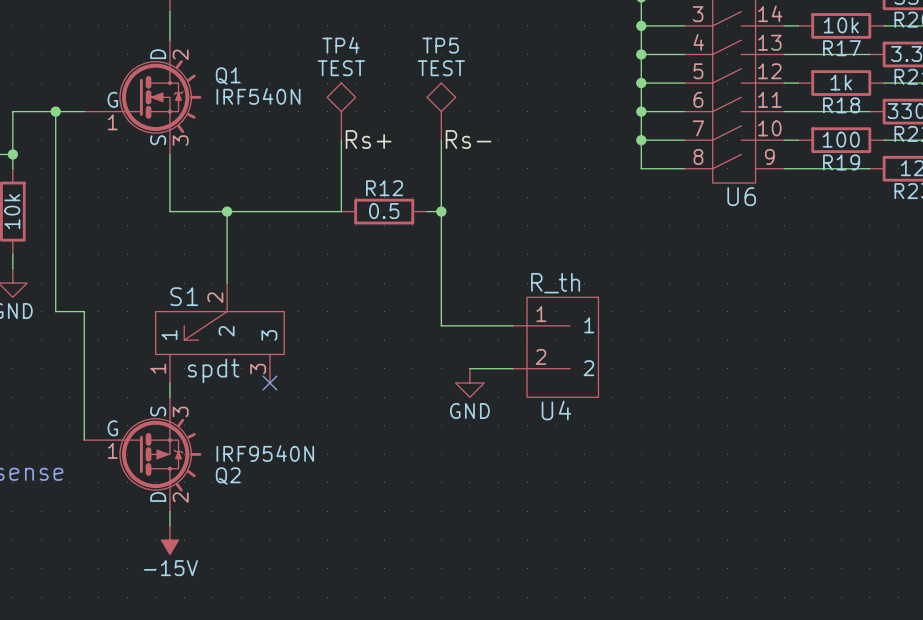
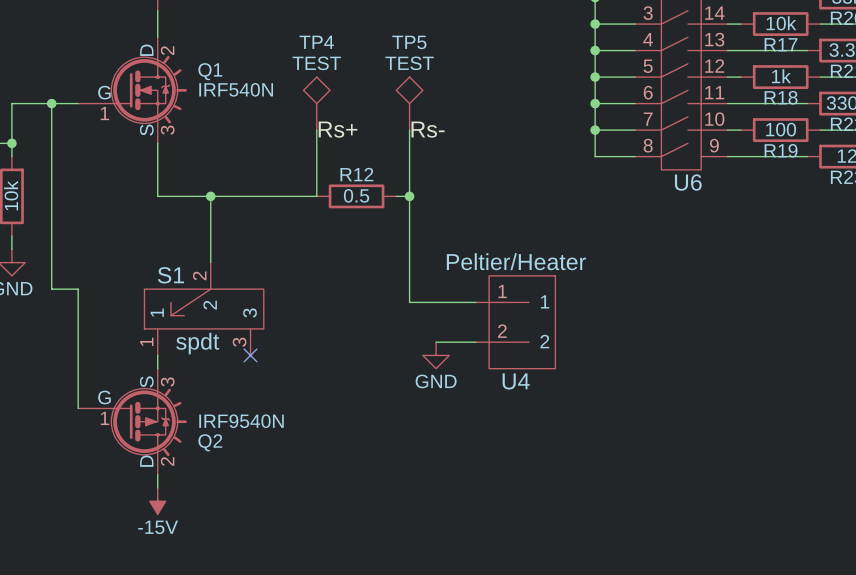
U4 value: R_th (555, 283) -> Peltier/Heater (516, 261)

